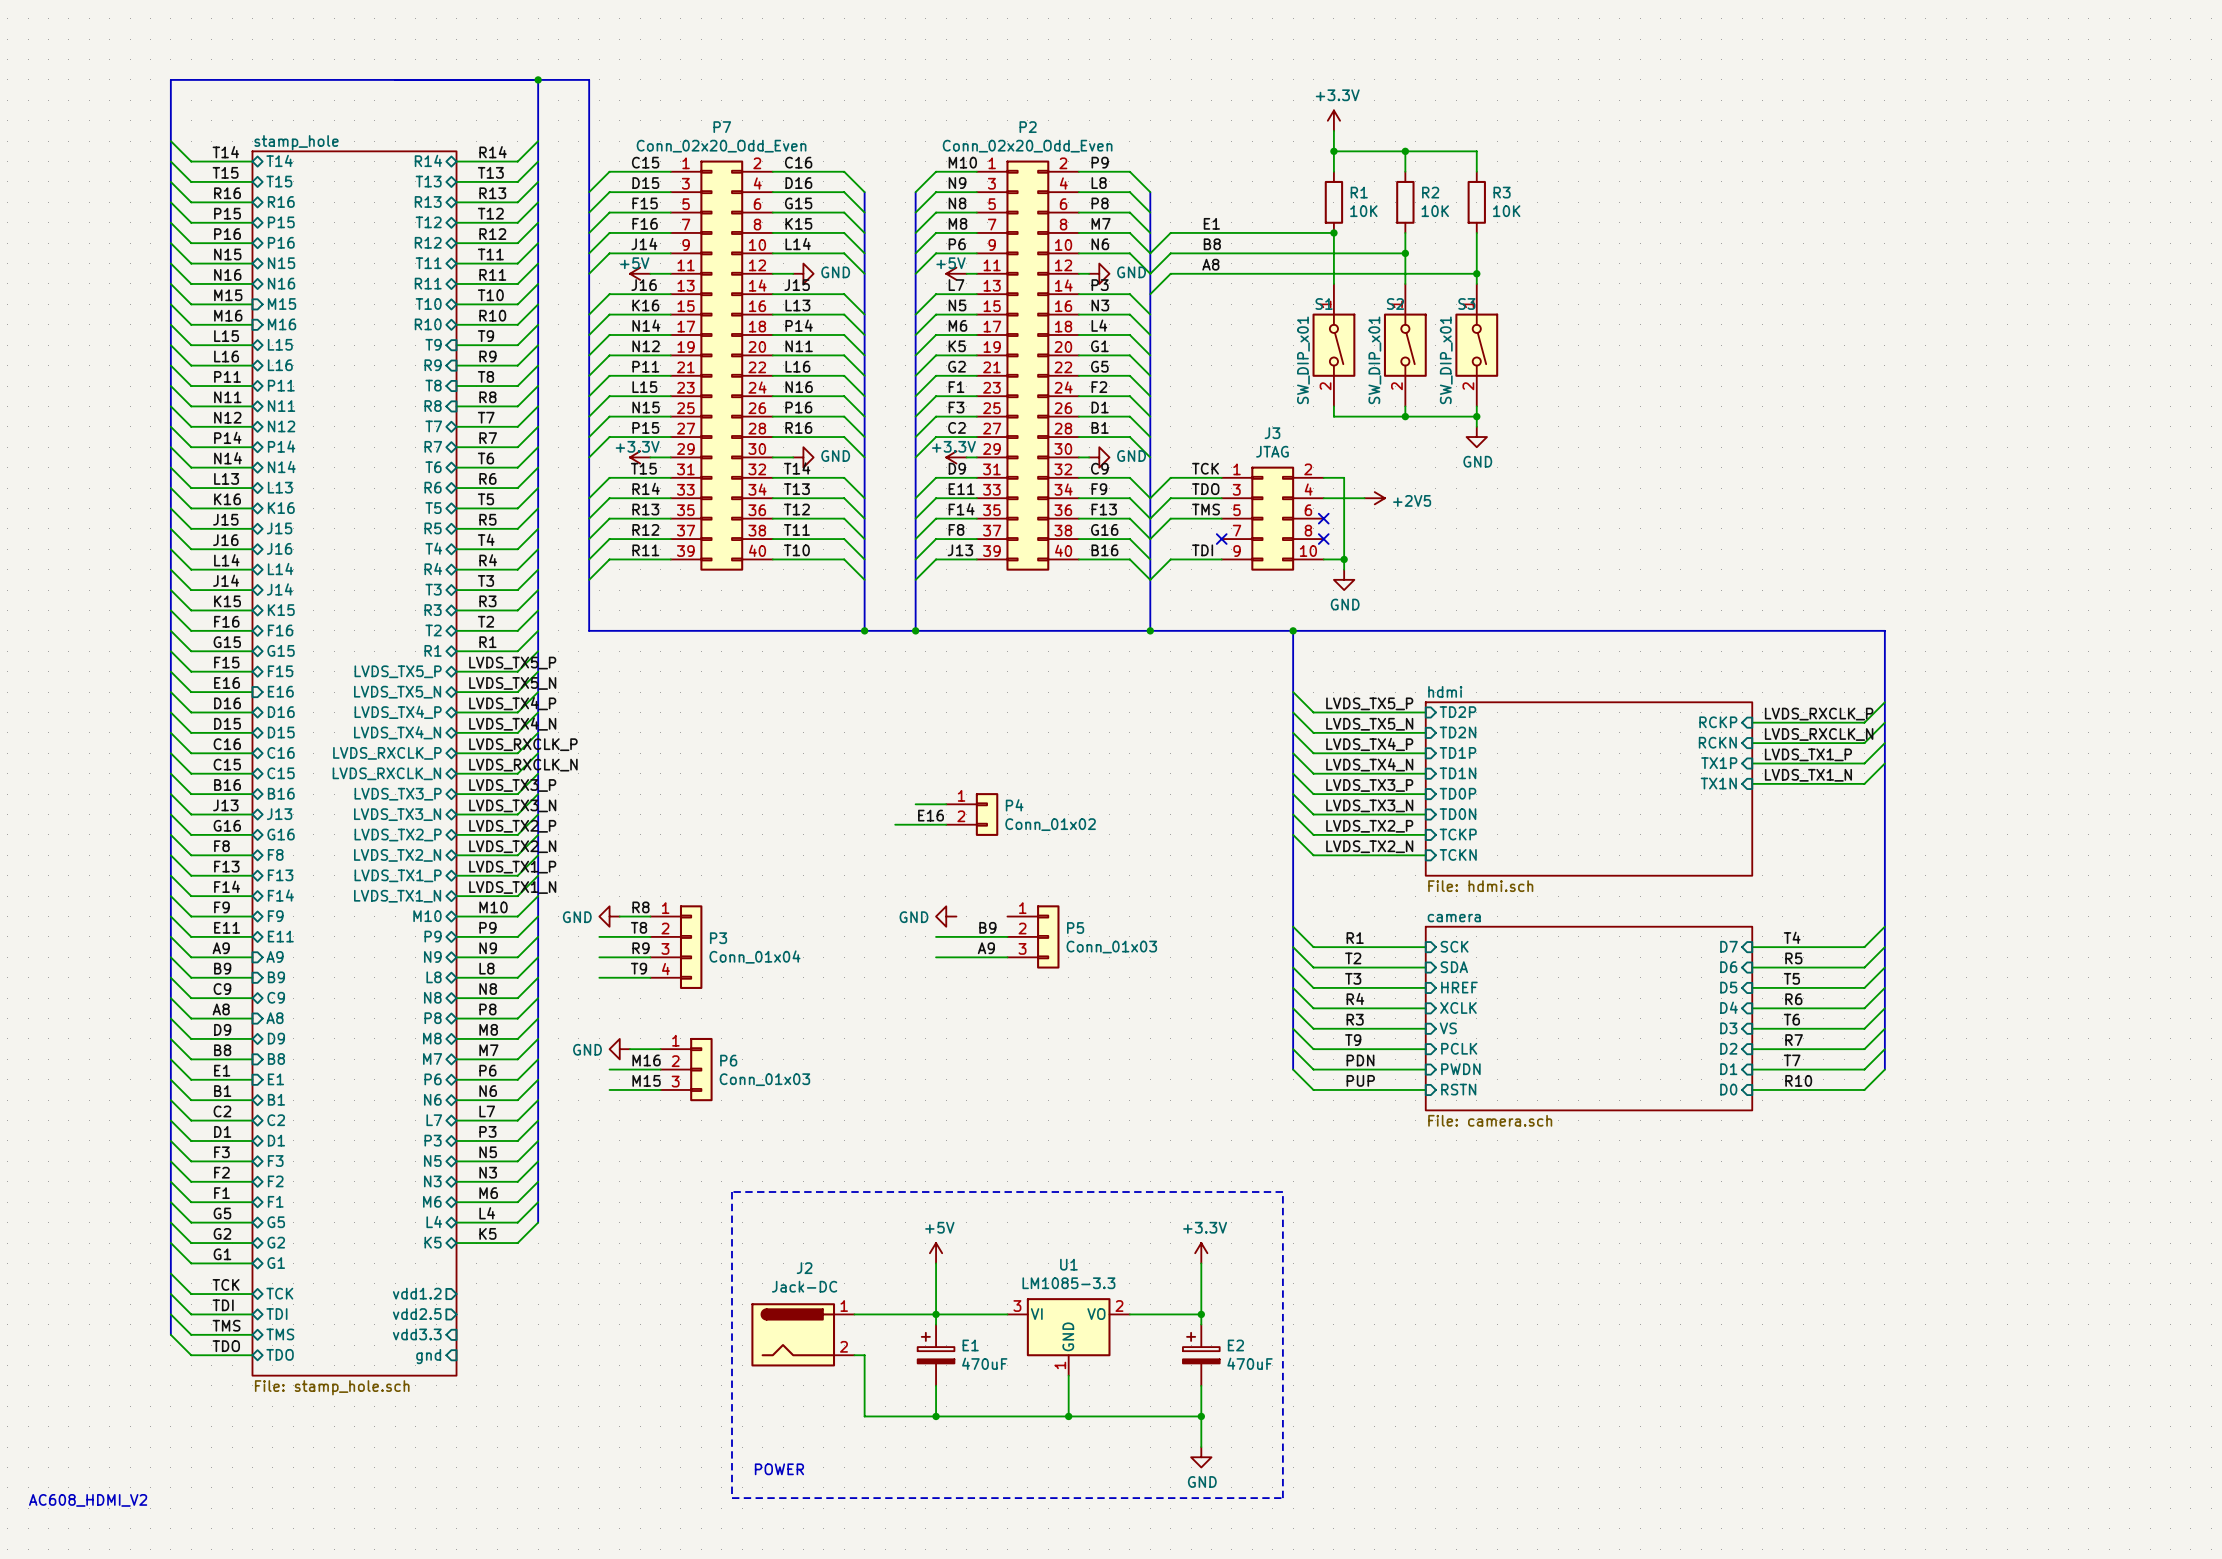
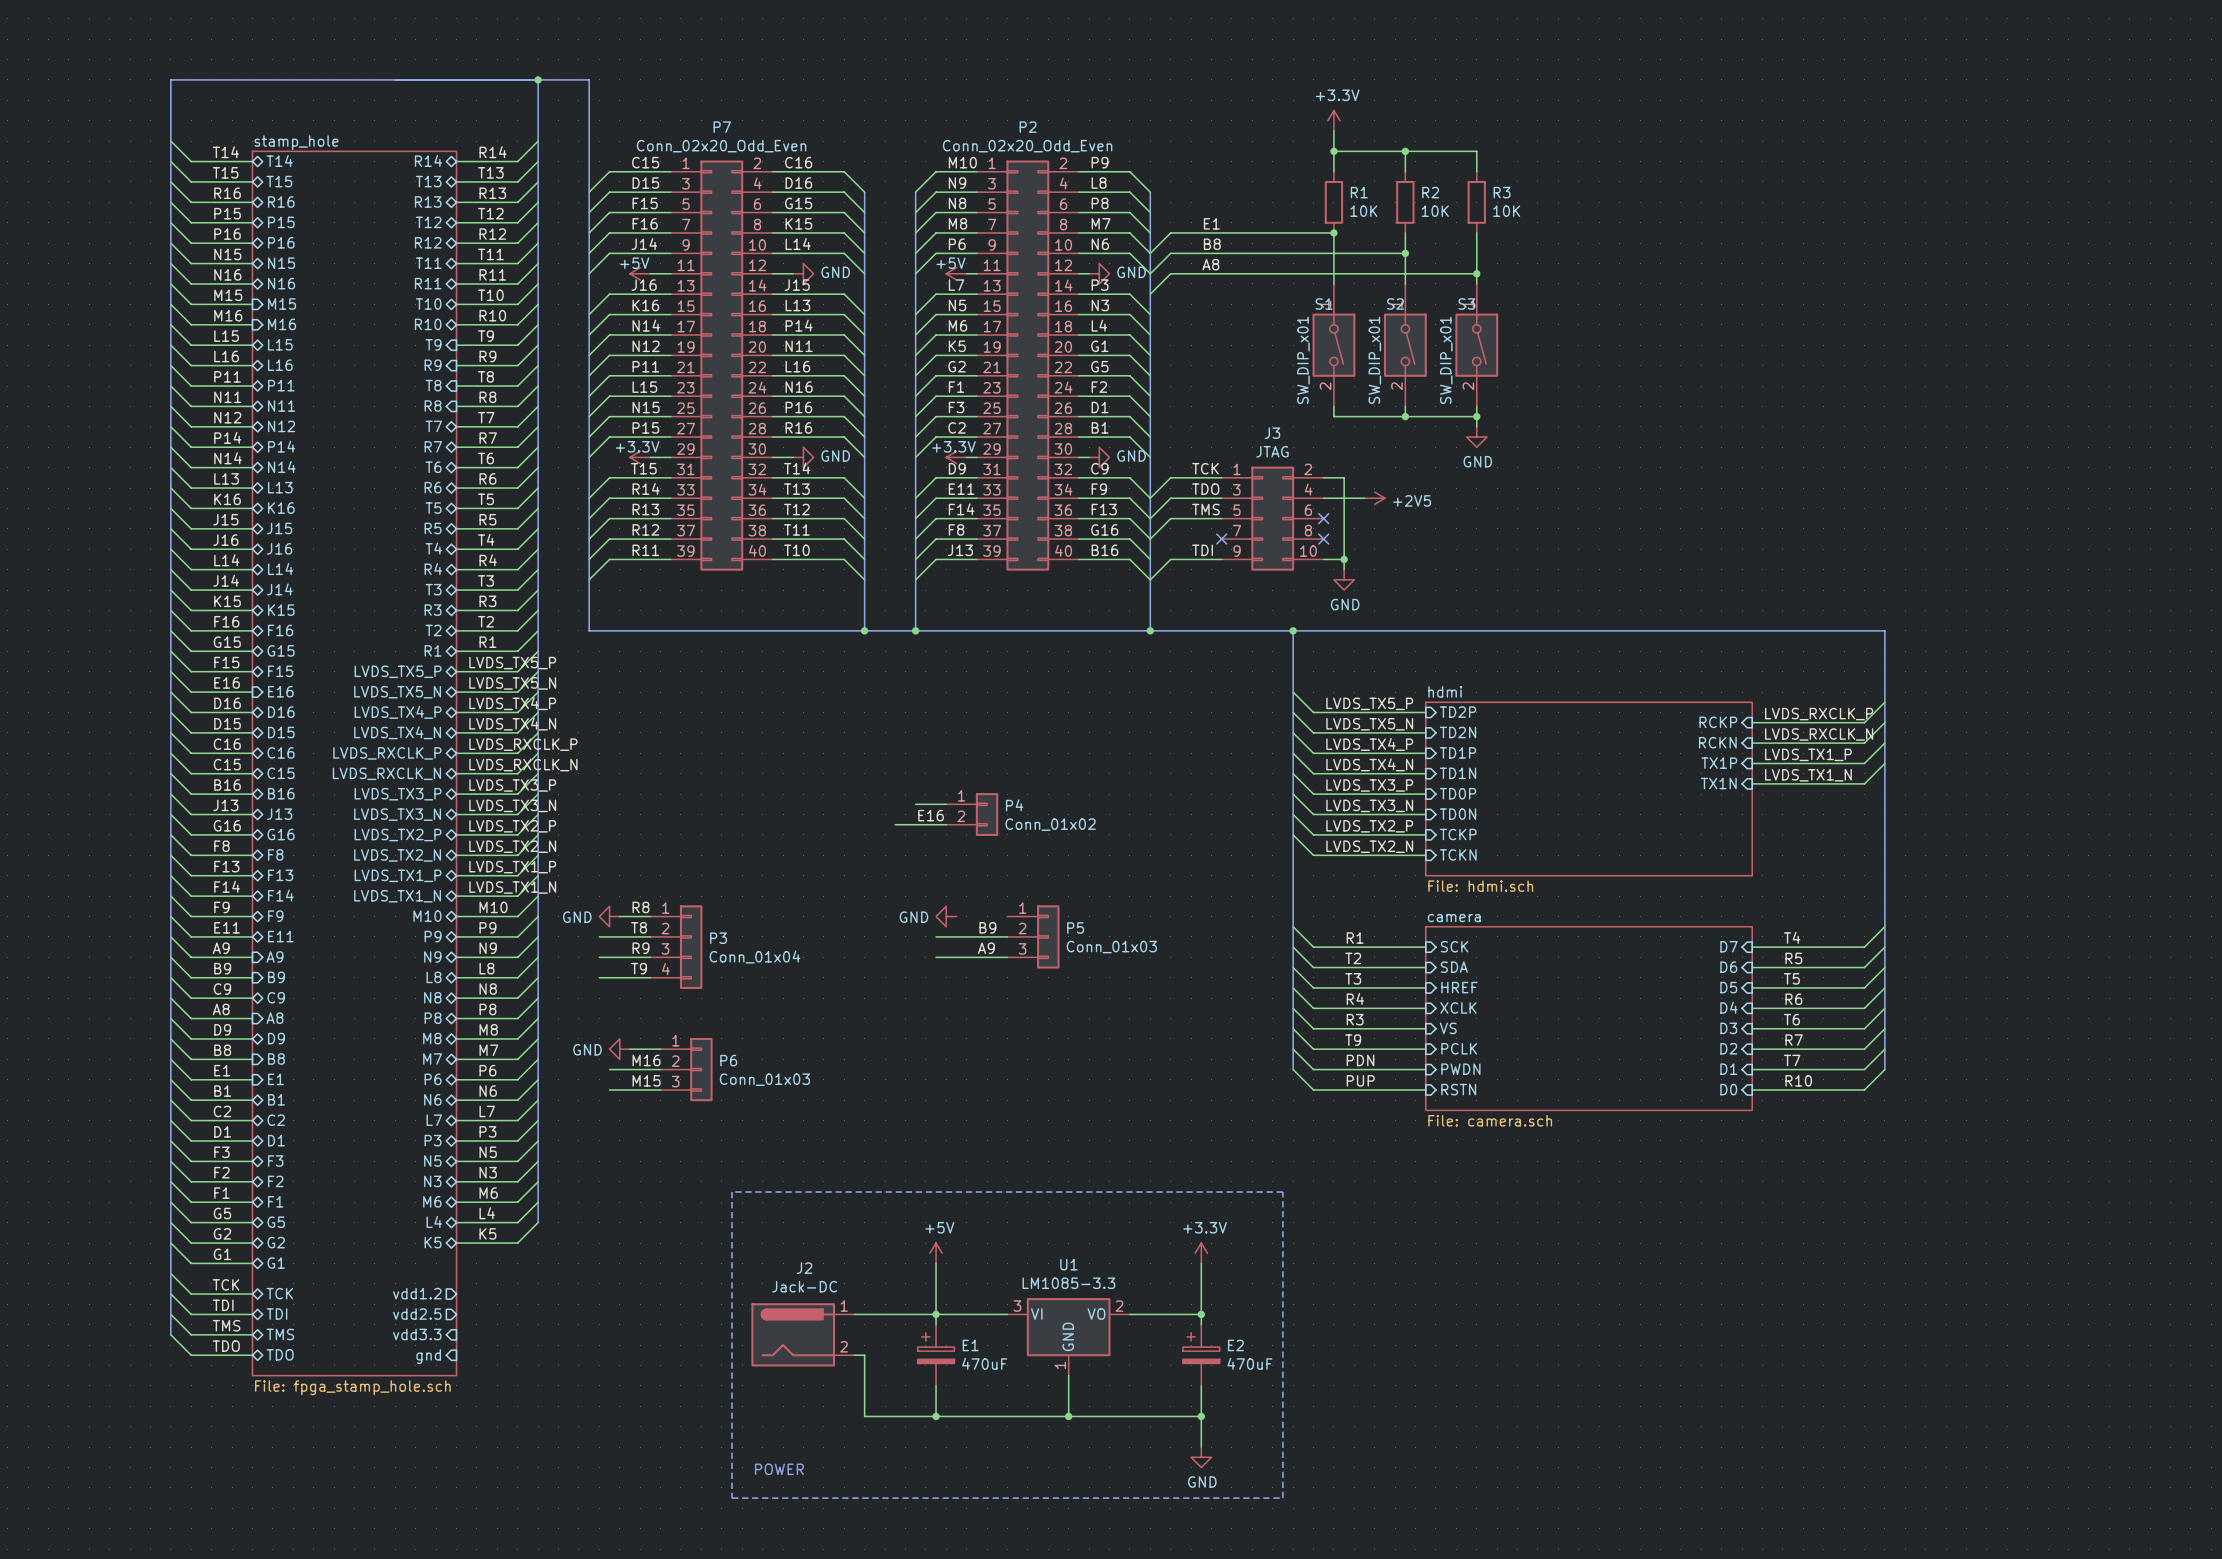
sheet stamp_hole value: File: stamp_hole.sch (332, 1387) -> File: fpga_stamp_hole.sch (352, 1387)
text: AC608_HDMI_V2 (88, 1500) -> none

